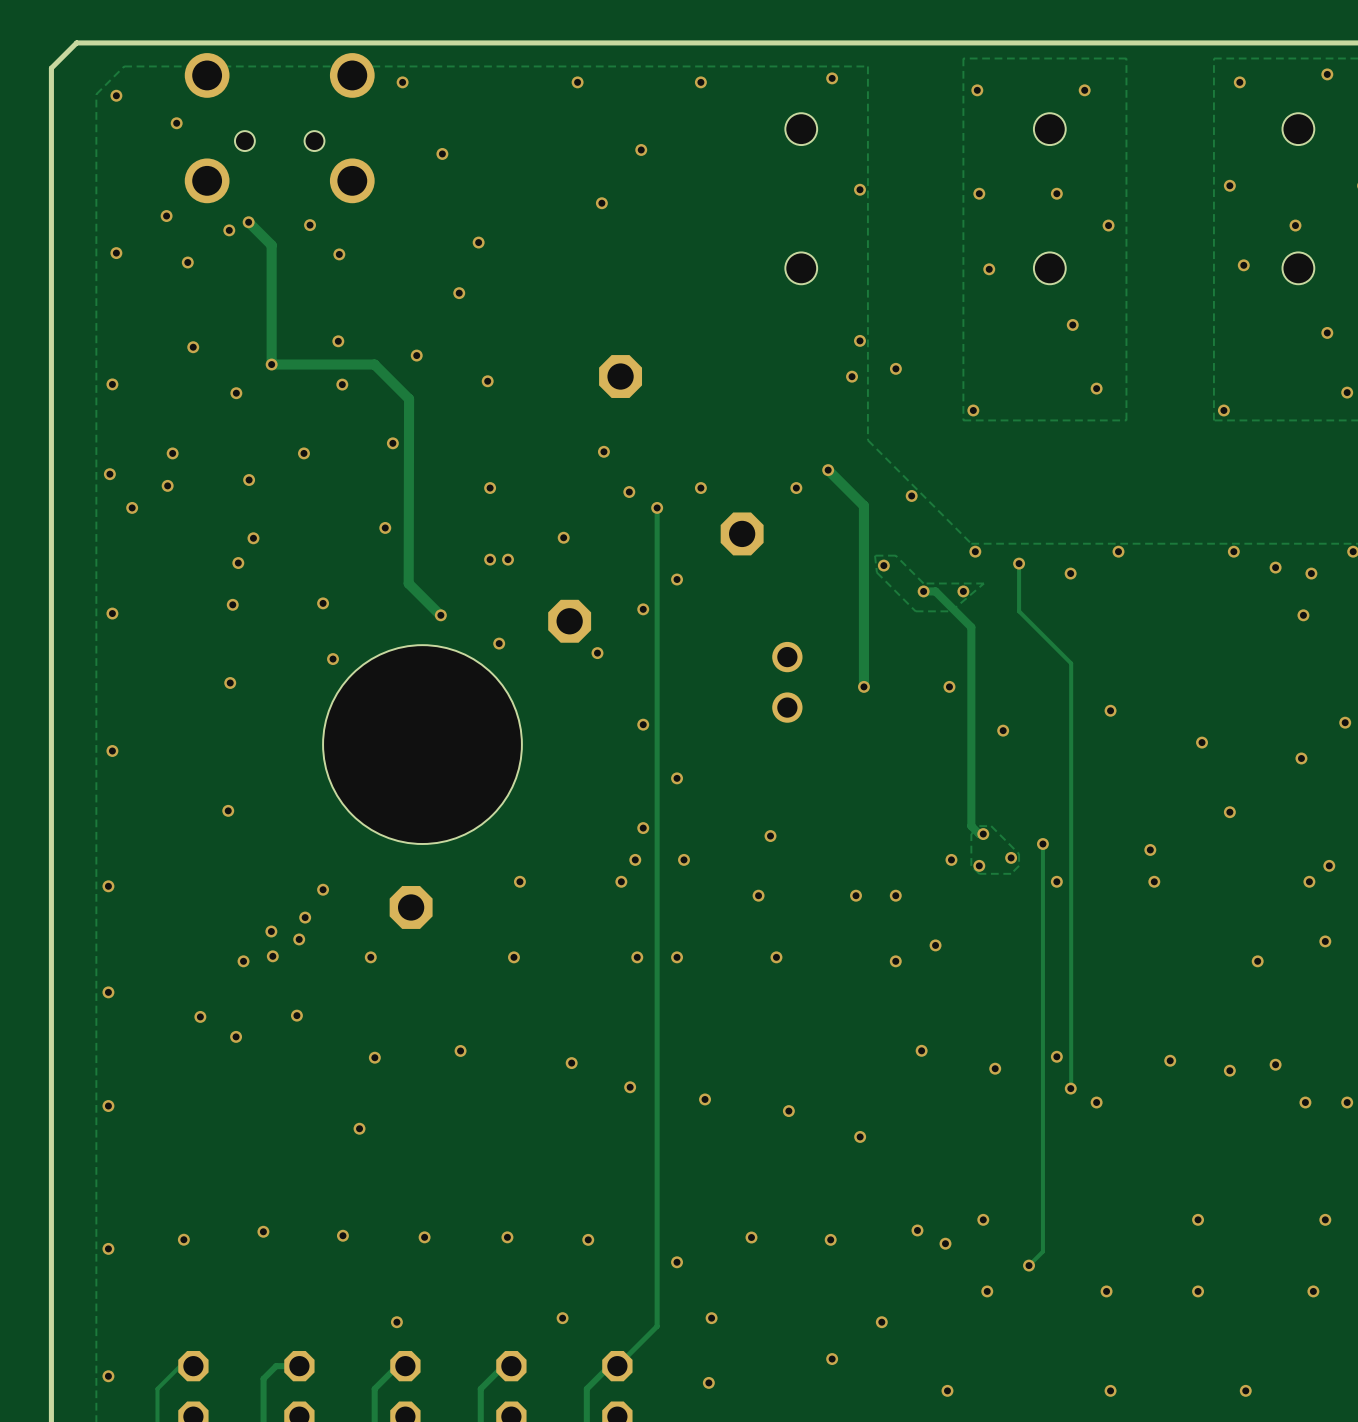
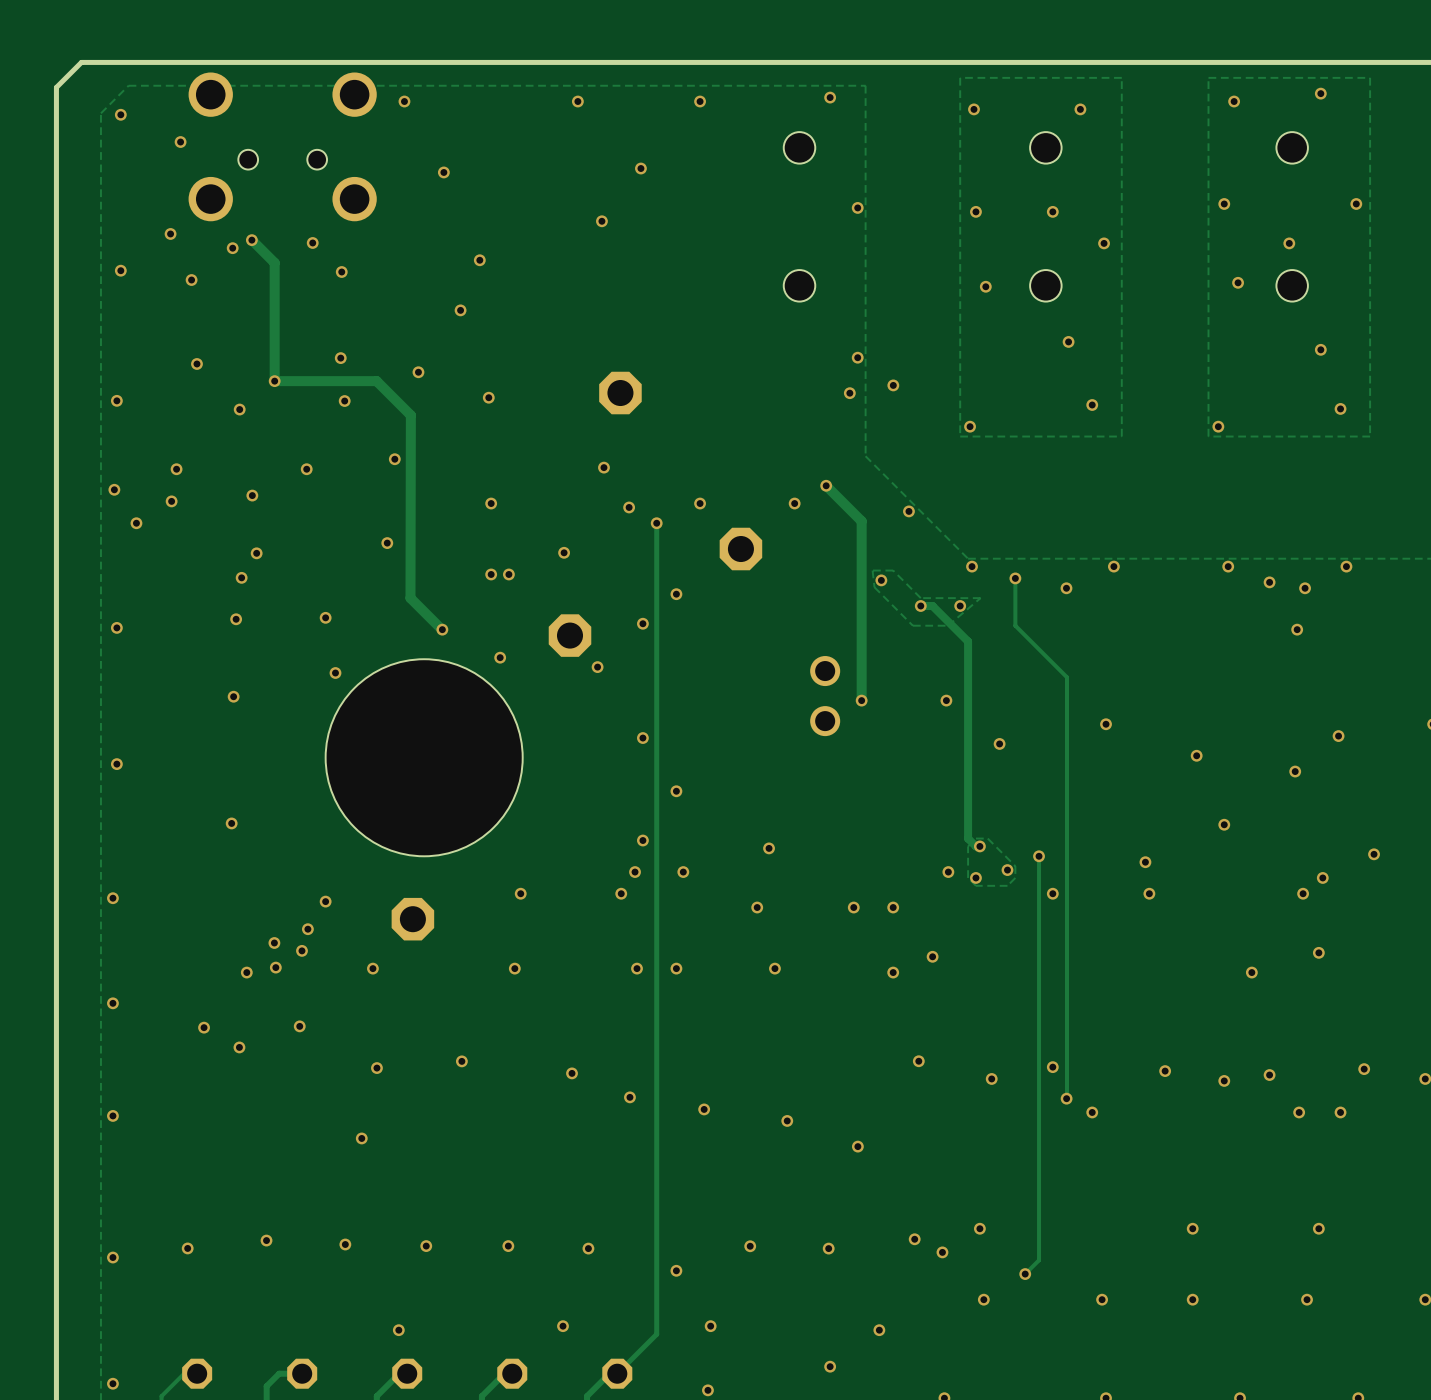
part position: (787, 682) -> (825, 696)

